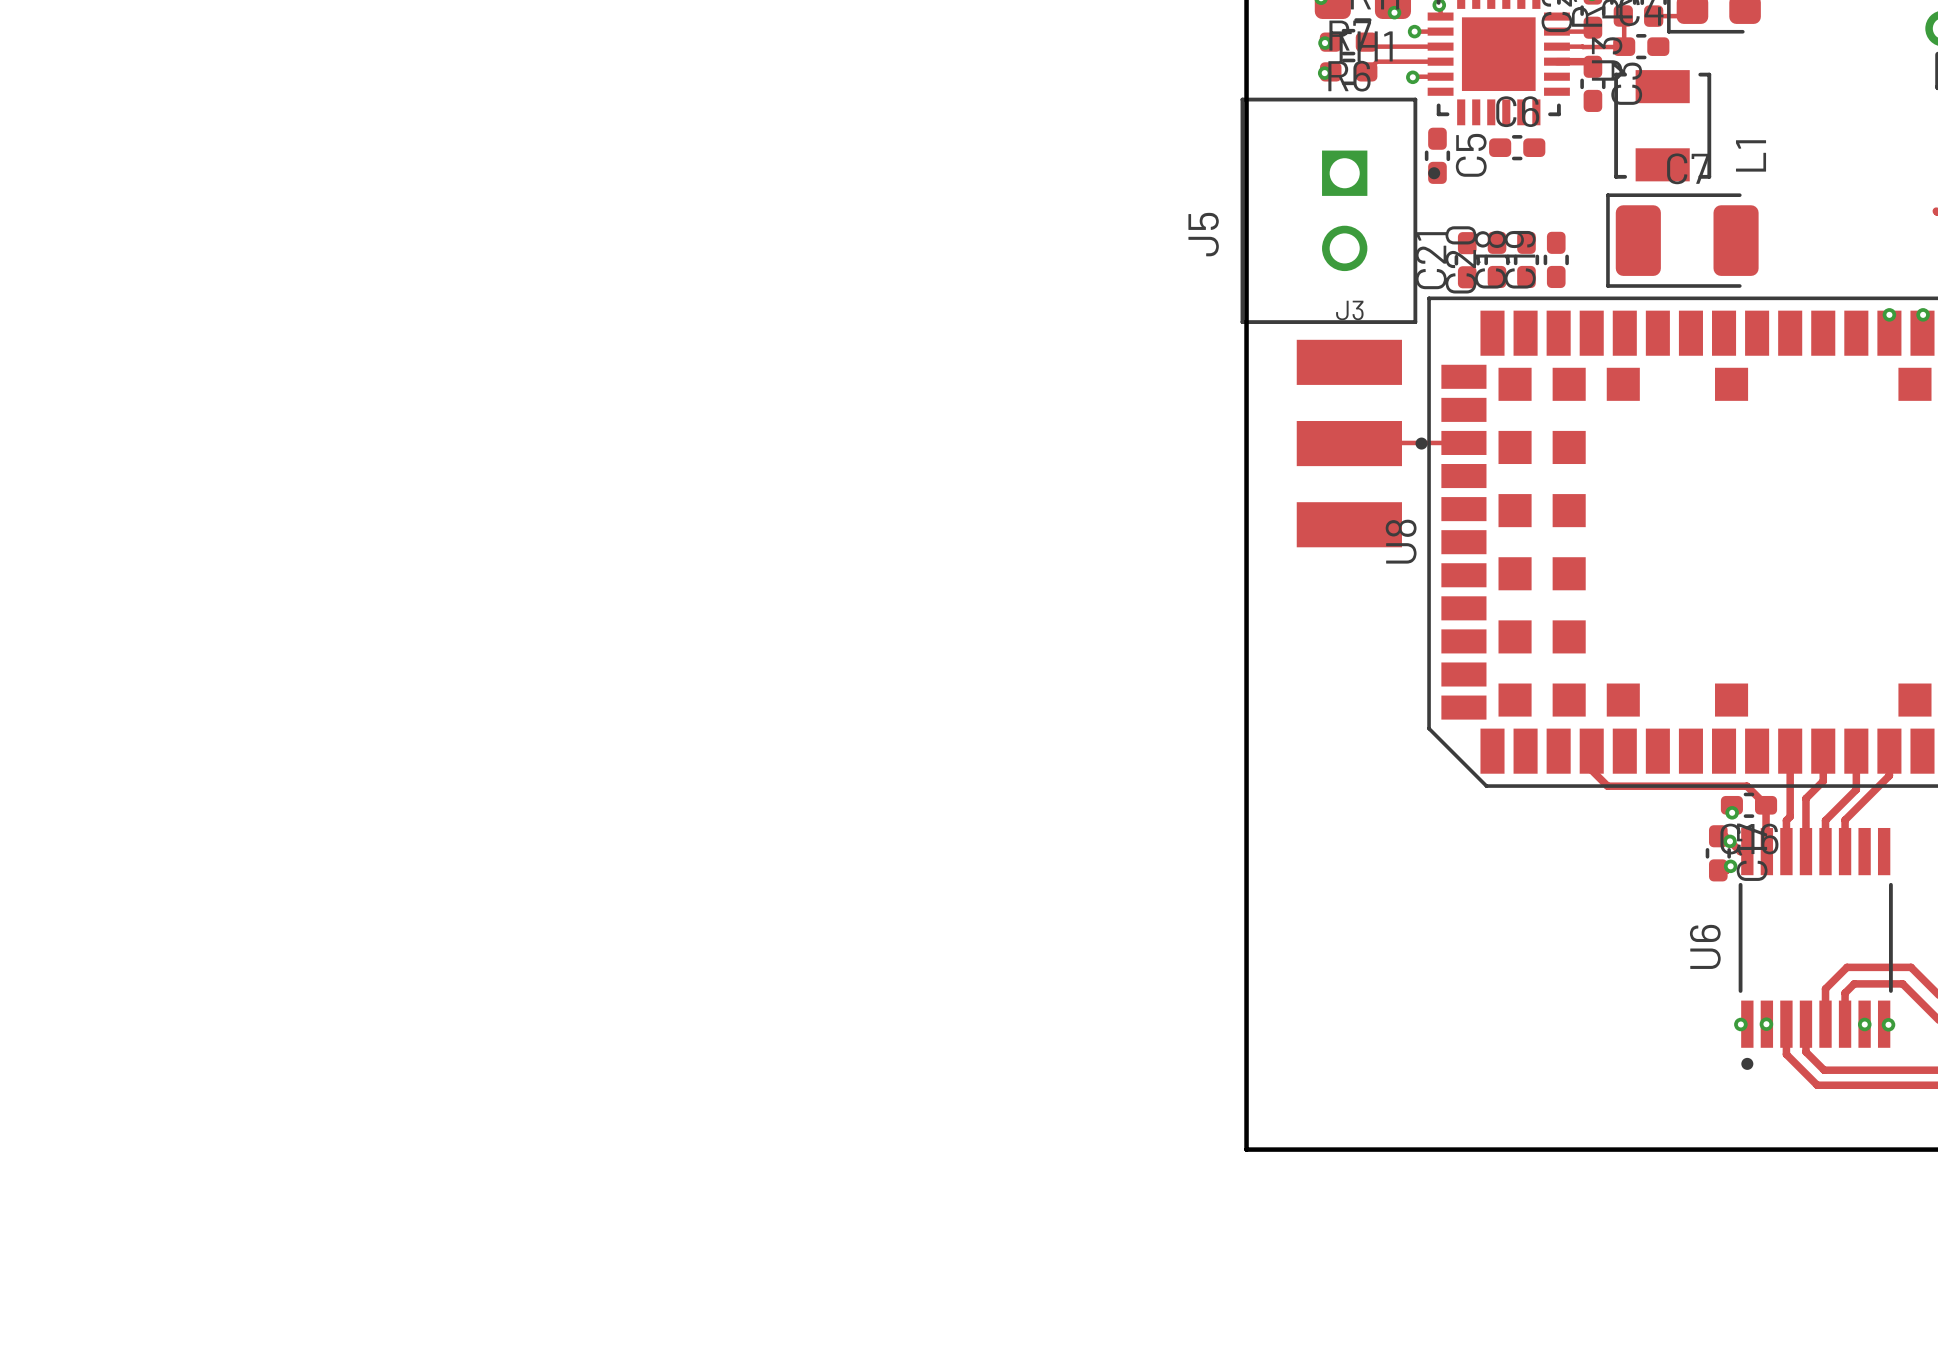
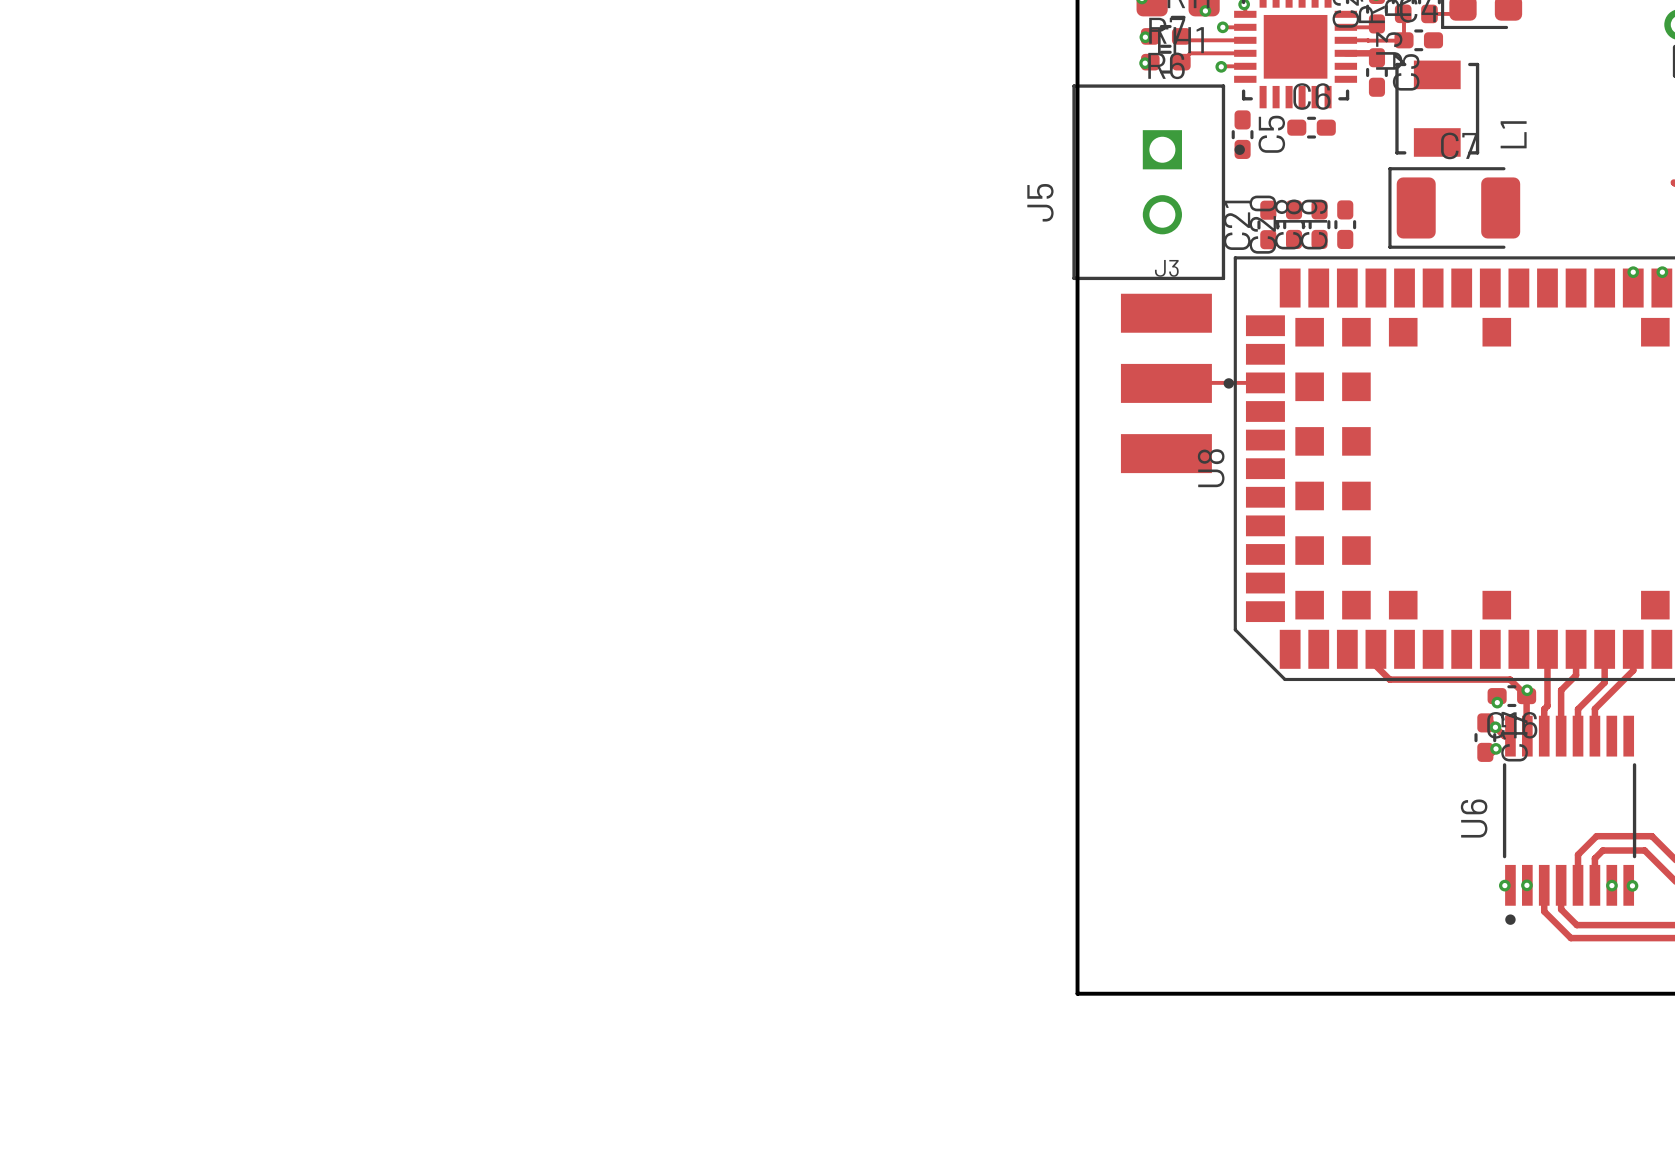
via: none -> (1527, 690)

